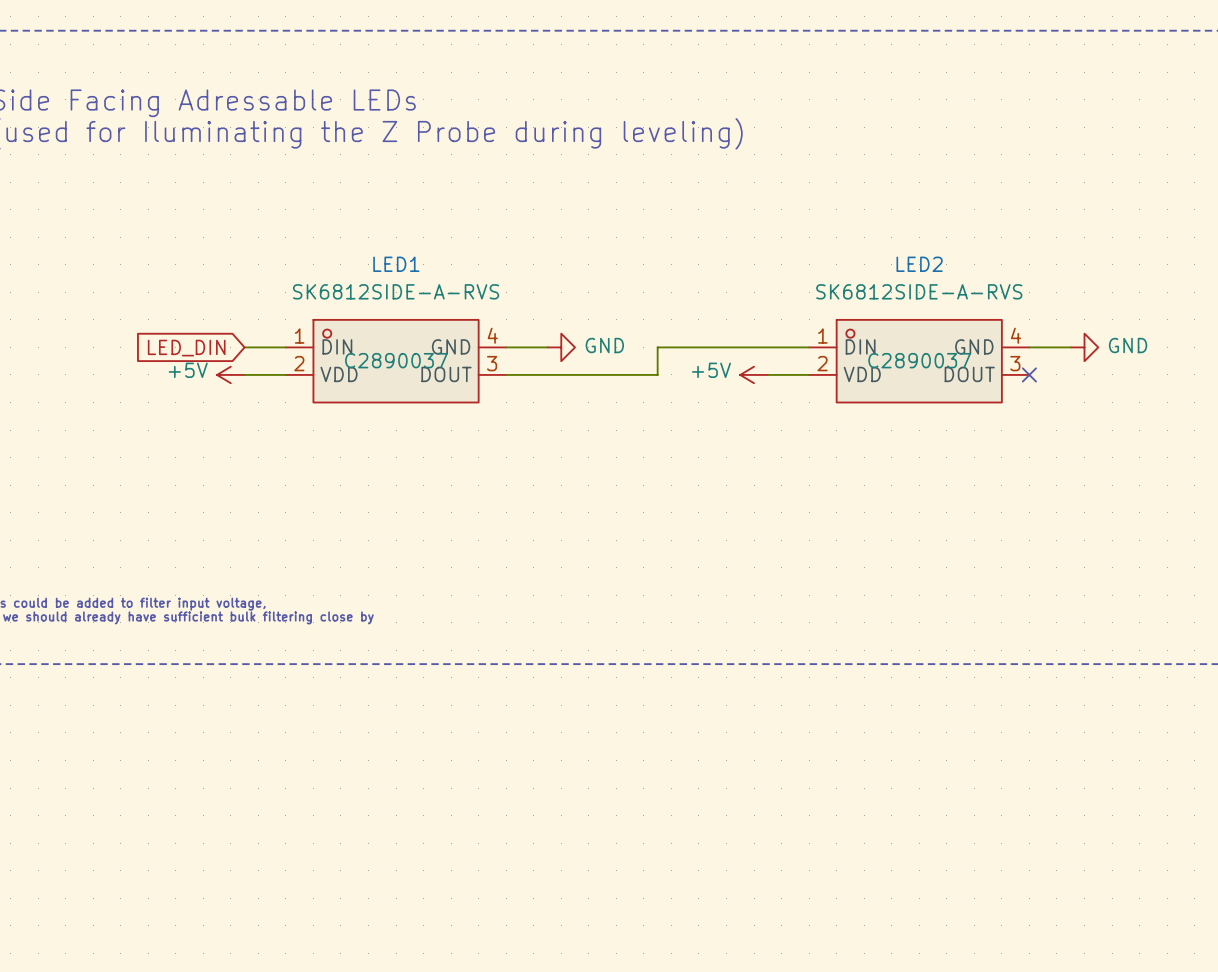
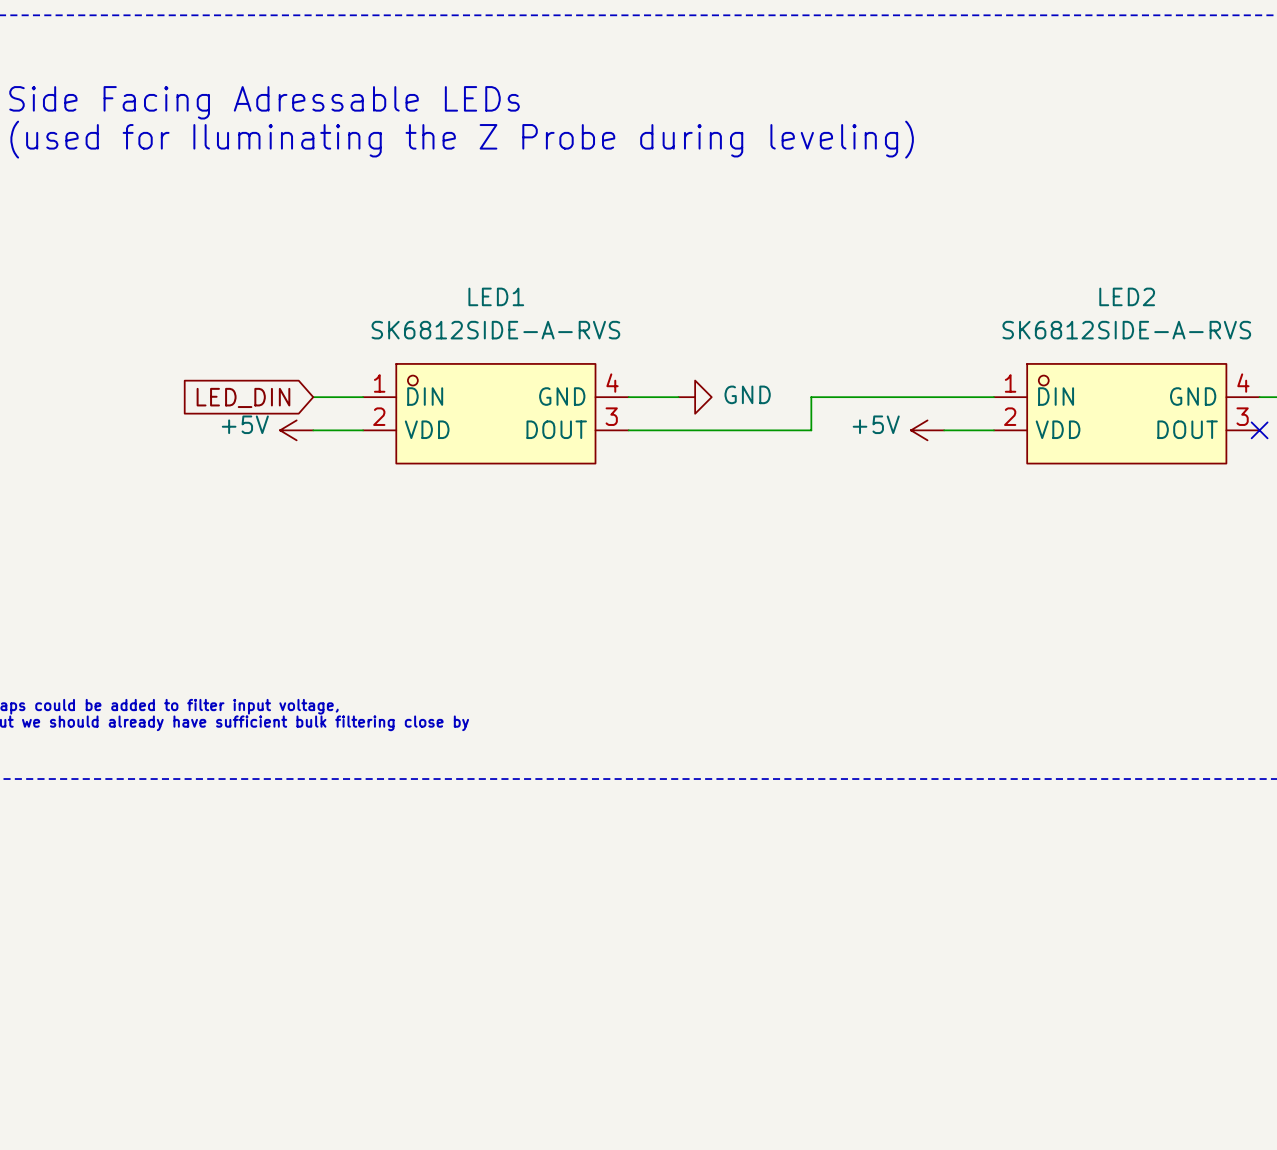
LED1 text: C2890037 (396, 360) -> none
LED2 text: C2890037 (919, 360) -> none

